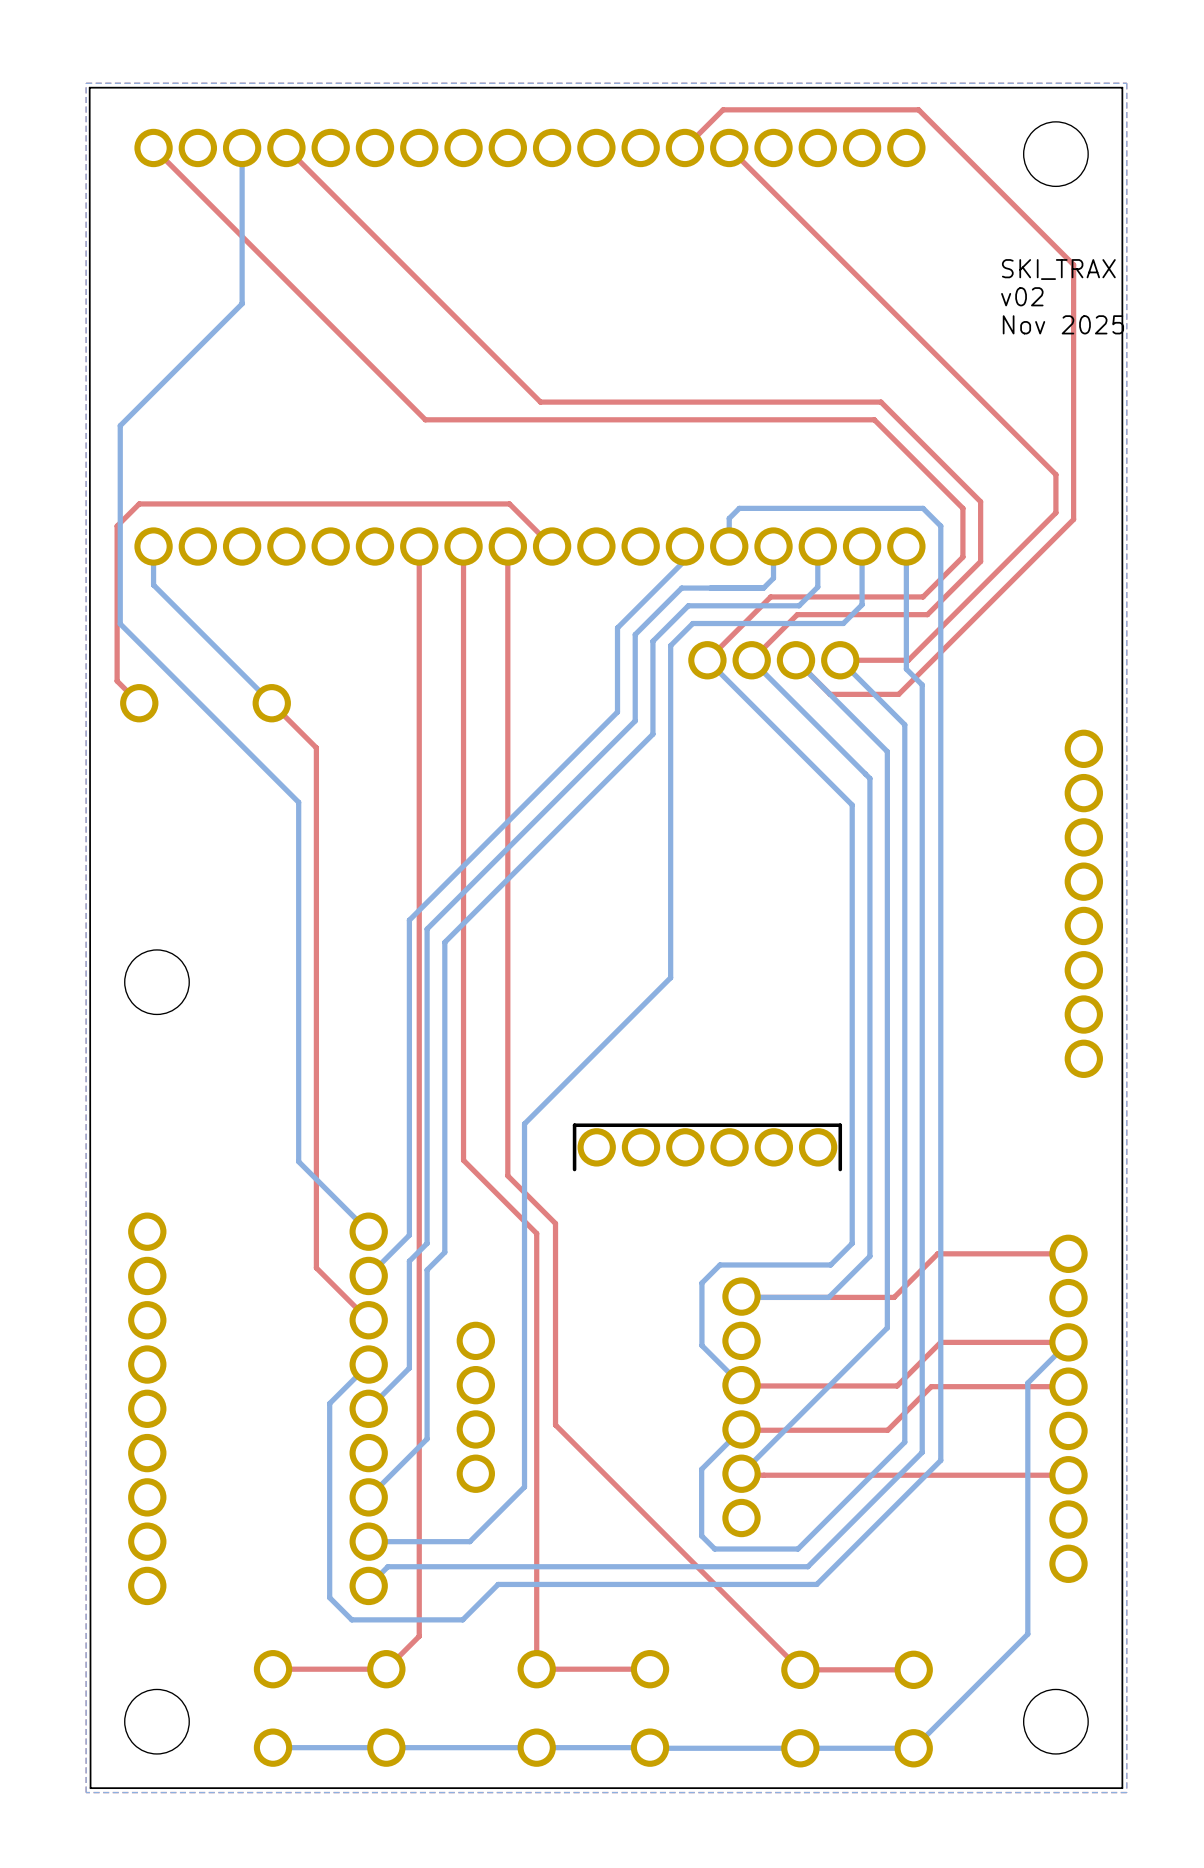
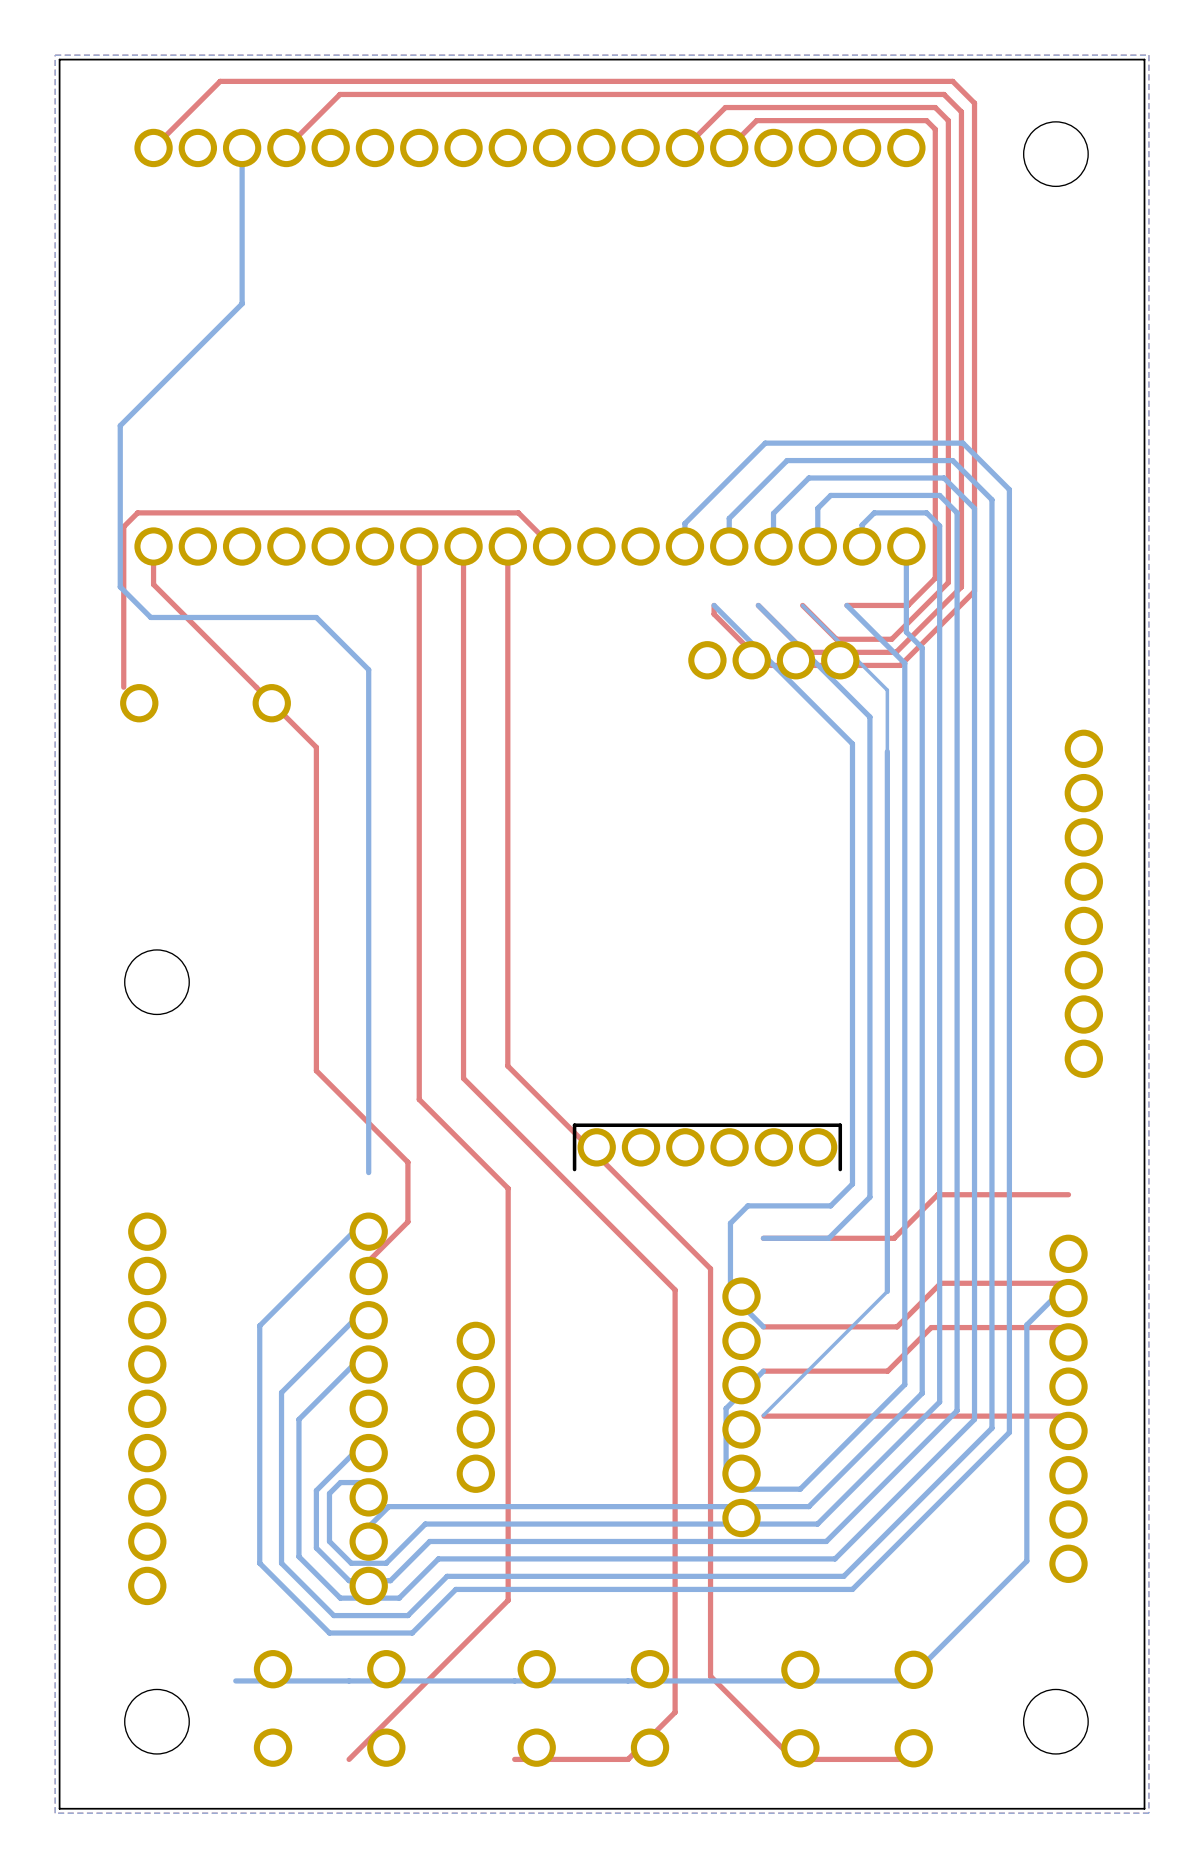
bottom zone outline: (1126, 83) (86, 83) (86, 1792) (1126, 1792) (1126, 83) -> (1148, 55) (1148, 1813) (55, 1813) (55, 55) (1148, 55)
board edge: (1122, 87) (1122, 1788) (90, 1788) (89, 87) (1122, 87) -> (1144, 59) (1144, 1808) (59, 1808) (59, 59) (1144, 59)
top track: (723, 109) (918, 109) (1073, 264) (1073, 519) (898, 694) (830, 694) (795, 660) -> (723, 109) (725, 107) (935, 107) (948, 120) (948, 582) (891, 639) (836, 639) (802, 605)
top track: (153, 147) (425, 419) (874, 419) (962, 508) (962, 557) (923, 596) (770, 596) (707, 660) -> (153, 147) (220, 81) (952, 81) (974, 103) (974, 591) (900, 665) (765, 665) (714, 614) (714, 605)
top track: (286, 147) (540, 402) (880, 402) (980, 501) (980, 561) (927, 614) (797, 614) (751, 660) -> (286, 147) (339, 94) (944, 94) (961, 111) (961, 586) (896, 652) (805, 652) (758, 605)
top track: (729, 147) (1055, 474) (1055, 512) (908, 660) (840, 660) -> (729, 147) (756, 120) (926, 120) (935, 129) (935, 578) (908, 605) (846, 605)
text: SKI_TRAX (1058, 269) -> none
text: v02 (1022, 296) -> none
text: Nov 2025 (1063, 324) -> none
bottom track: (739, 508) (923, 508) (940, 526) (940, 1460) (816, 1584) (498, 1584) (462, 1619) (351, 1619) (329, 1597) (329, 1403) (368, 1364) -> (739, 508) (787, 460) (952, 460) (991, 499) (991, 1428) (843, 1576) (447, 1576) (407, 1615) (333, 1615) (281, 1563) (281, 1392) (368, 1305)
top track: (518, 512) (509, 503) (139, 503) (117, 526) (117, 681) (139, 703) -> (518, 512) (137, 512) (123, 526) (123, 687)
bottom track: (153, 546) (153, 585) (271, 703) -> none
bottom track: (684, 546) (684, 560) (617, 627) (617, 712) (409, 920) (409, 1235) (368, 1275) -> (684, 546) (684, 523) (765, 443) (962, 443) (1009, 489) (1009, 1432) (852, 1589) (455, 1589) (412, 1633) (329, 1633) (259, 1563) (259, 1325) (368, 1216)
bottom track: (773, 546) (773, 578) (763, 588) (681, 588) (635, 634) (635, 720) (427, 929) (427, 1243) (409, 1261) (409, 1368) (368, 1408) -> (773, 546) (773, 513) (808, 478) (944, 478) (974, 508) (974, 1419) (835, 1558) (438, 1558) (399, 1598) (340, 1598) (298, 1556) (298, 1419) (368, 1349)
bottom track: (817, 546) (817, 587) (799, 605) (688, 605) (652, 641) (652, 734) (444, 942) (444, 1252) (427, 1270) (427, 1438) (368, 1497) (359, 1497) -> (817, 546) (817, 508) (830, 495) (939, 495) (957, 512) (957, 1410) (826, 1541) (429, 1541) (390, 1580) (349, 1580) (316, 1548) (316, 1490) (368, 1438)
bottom track: (862, 546) (862, 604) (843, 623) (692, 623) (670, 645) (670, 977) (524, 1123) (524, 1487) (469, 1541) (368, 1541) (366, 1543) -> (862, 546) (862, 525) (874, 512) (926, 512) (939, 525) (939, 1402) (817, 1524) (425, 1524) (386, 1563) (351, 1563) (329, 1541) (329, 1493) (340, 1482) (368, 1482) (366, 1484)
bottom track: (120, 586) (120, 623) (298, 802) (298, 1161) (368, 1231) -> (120, 586) (150, 617) (316, 617) (368, 669) (368, 1172)
bottom track: none -> (714, 605) (852, 743) (852, 1184) (830, 1205) (747, 1205) (730, 1223) (730, 1293) (763, 1326)
bottom track: (906, 632) (906, 669) (922, 684) -> (906, 632) (922, 647) (922, 684)
bottom track: (707, 660) (852, 805) (852, 1243) (830, 1264) (719, 1264) (701, 1283) (701, 1345) (741, 1385) -> none
bottom track: (751, 660) (869, 778) -> (758, 605) (869, 717) (869, 778)
bottom track: (795, 660) (887, 751) -> (802, 605) (887, 690) (887, 751)
bottom track: (840, 660) (904, 724) -> (846, 605) (904, 663) (904, 724)
top track: (271, 703) (316, 747) -> (153, 546) (153, 584) (316, 747)
top track: (507, 1066) (507, 1175) (555, 1223) (555, 1425) (800, 1669) (913, 1669) -> (507, 1066) (710, 1268) (710, 1676) (793, 1759) (906, 1759)
top track: (316, 1070) (316, 1267) (368, 1320) -> (316, 1070) (407, 1162) (407, 1221) (368, 1261)
top track: (463, 1078) (463, 1160) (536, 1233) (536, 1669) (650, 1669) -> (463, 1078) (675, 1290) (675, 1712) (628, 1759) (514, 1759)
top track: (419, 1099) (419, 1636) (386, 1669) (273, 1669) -> (419, 1099) (508, 1188) (508, 1600) (349, 1759)
top track: none -> (1068, 1194) (937, 1194) (894, 1238) (763, 1238)
bottom track: (869, 1197) (869, 1256) (828, 1297) (741, 1296) -> (869, 1197) (828, 1238) (763, 1238)
top track: (1068, 1253) (937, 1253) (894, 1297) (741, 1296) -> none
top track: none -> (1068, 1283) (940, 1283) (897, 1326) (763, 1326)
bottom track: none -> (1068, 1283) (1026, 1324) (1026, 1561) (906, 1680) (235, 1680)
bottom track: (887, 1291) (887, 1327) (742, 1474) -> (887, 1291) (763, 1415)
top track: none -> (1068, 1327) (931, 1327) (887, 1371) (763, 1371)
top track: (1068, 1342) (940, 1342) (897, 1385) (741, 1385) -> none
bottom track: (1068, 1342) (1027, 1383) (1027, 1634) (913, 1748) (273, 1747) -> none
bottom track: (904, 1384) (904, 1442) (797, 1549) (714, 1549) (701, 1535) (701, 1469) (741, 1429) -> (904, 1384) (800, 1489) (743, 1489) (726, 1471) (726, 1408) (763, 1371)
top track: (1068, 1386) (931, 1386) (887, 1430) (741, 1429) -> none
bottom track: (922, 1393) (922, 1452) (807, 1566) (387, 1566) (368, 1585) -> (922, 1393) (808, 1506) (388, 1506) (368, 1526)
top track: none -> (763, 1415) (1068, 1416)
top track: (741, 1473) (1068, 1475) -> none

